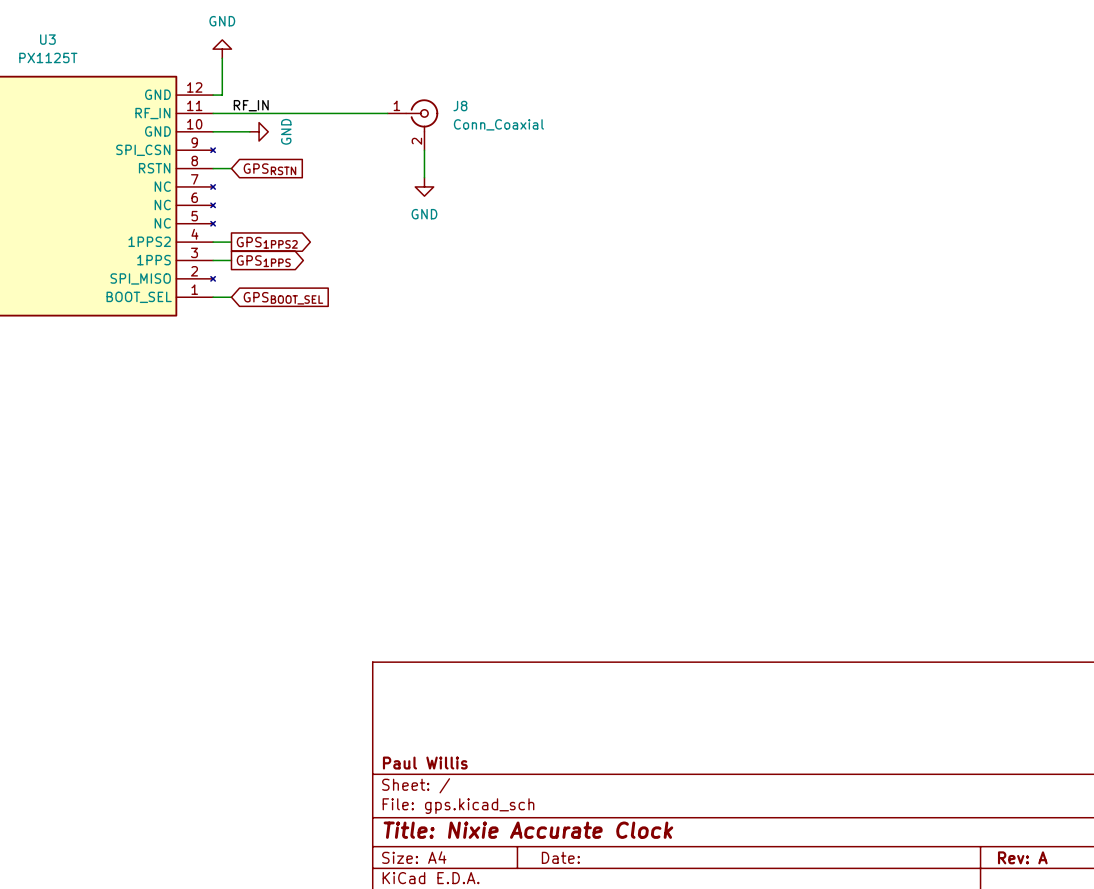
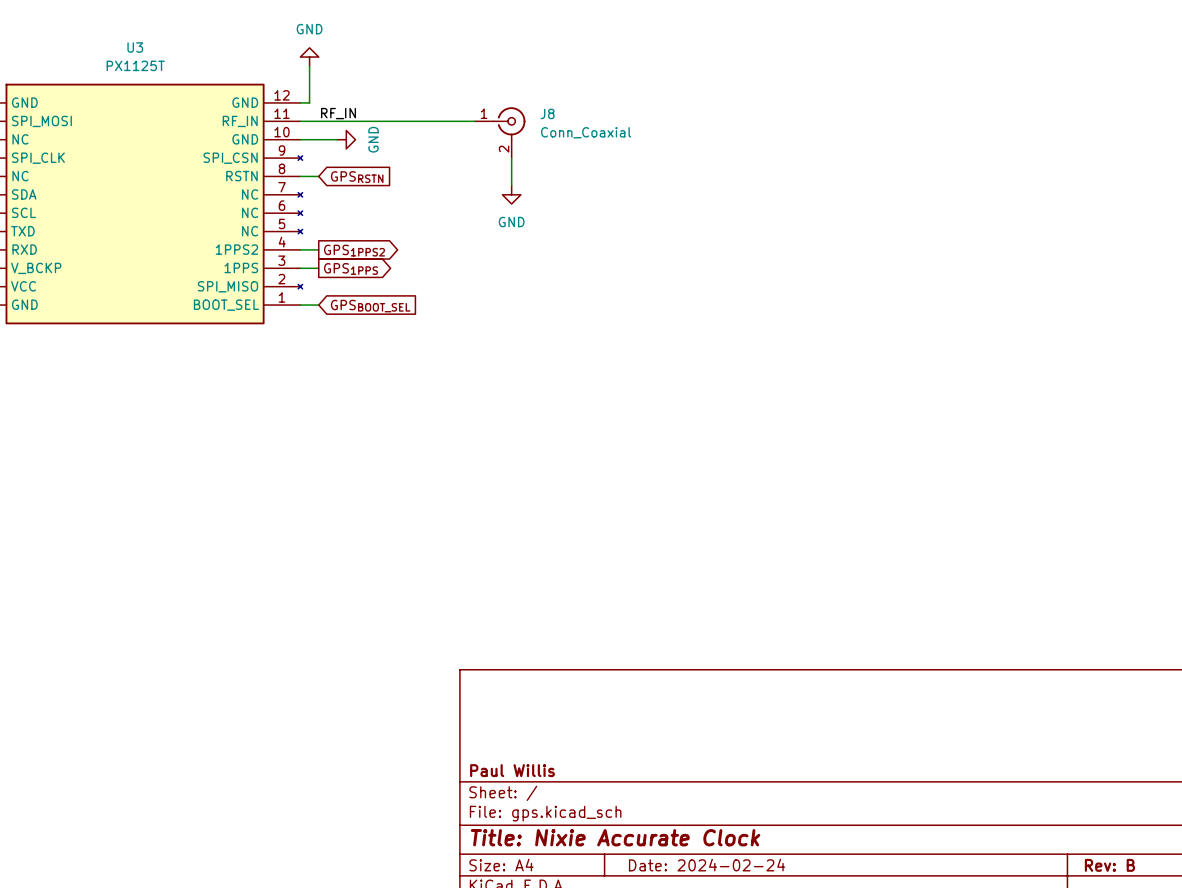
title block: Date: (560, 857) -> Date: 2024-02-24 (707, 865)
title block: Rev: A (1022, 857) -> Rev: B (1109, 865)

